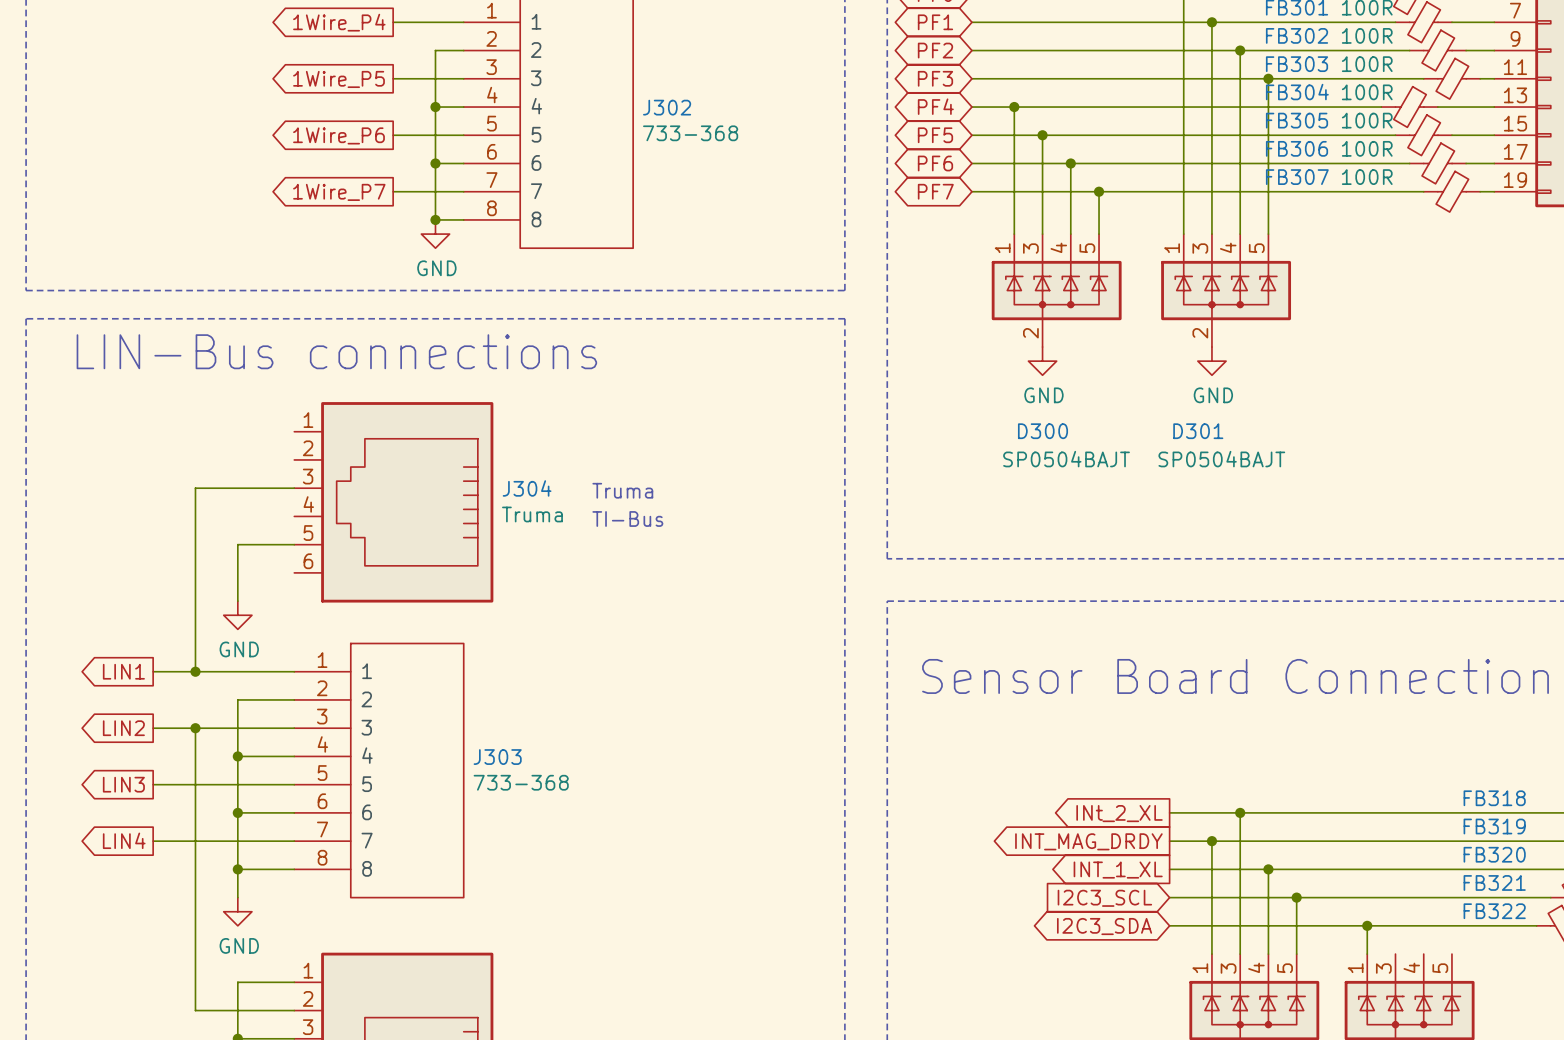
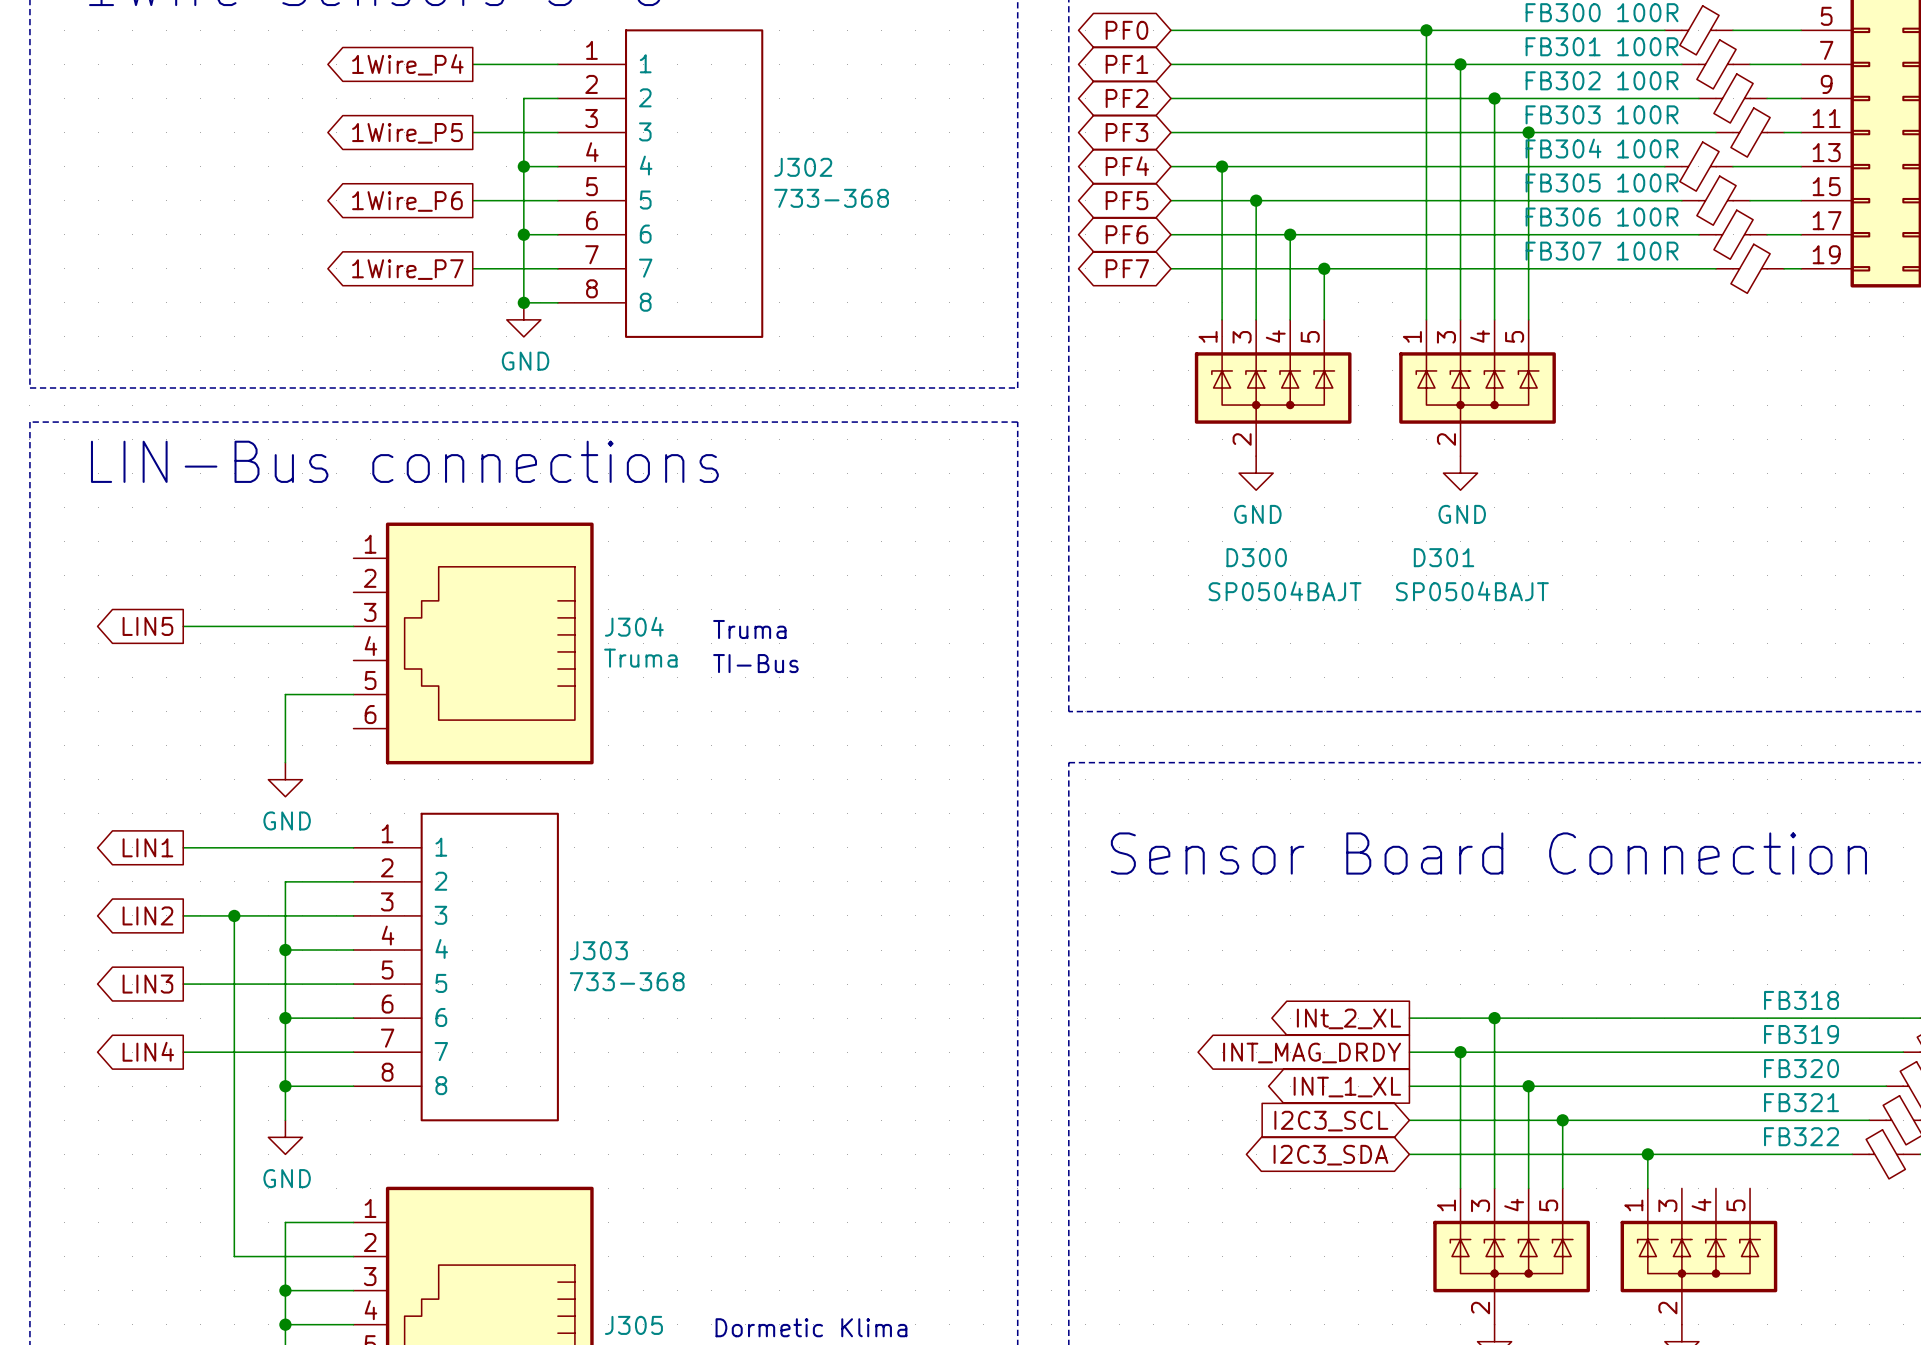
global label: none -> LIN5 (147, 626)
wire: (195, 488) (195, 671) -> (234, 626) (183, 626)
junction: (195, 671) -> none

